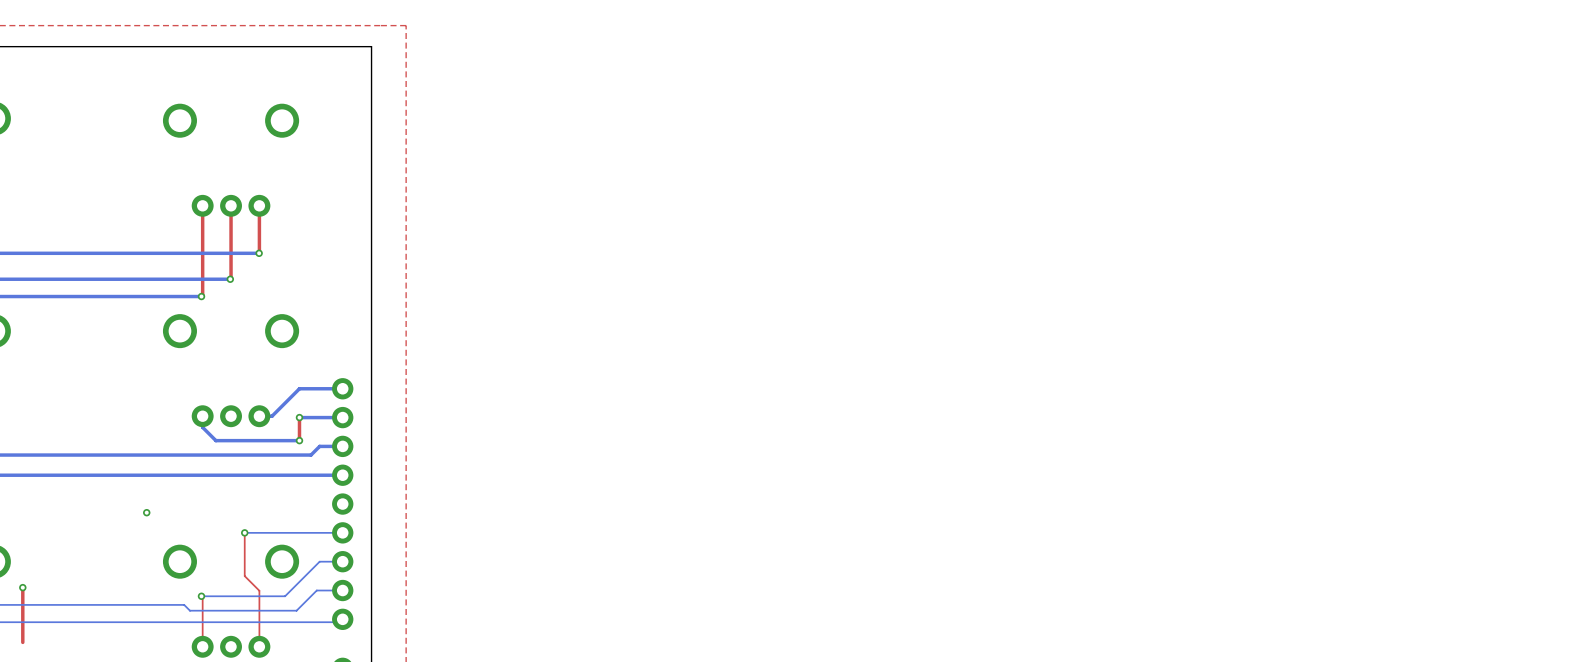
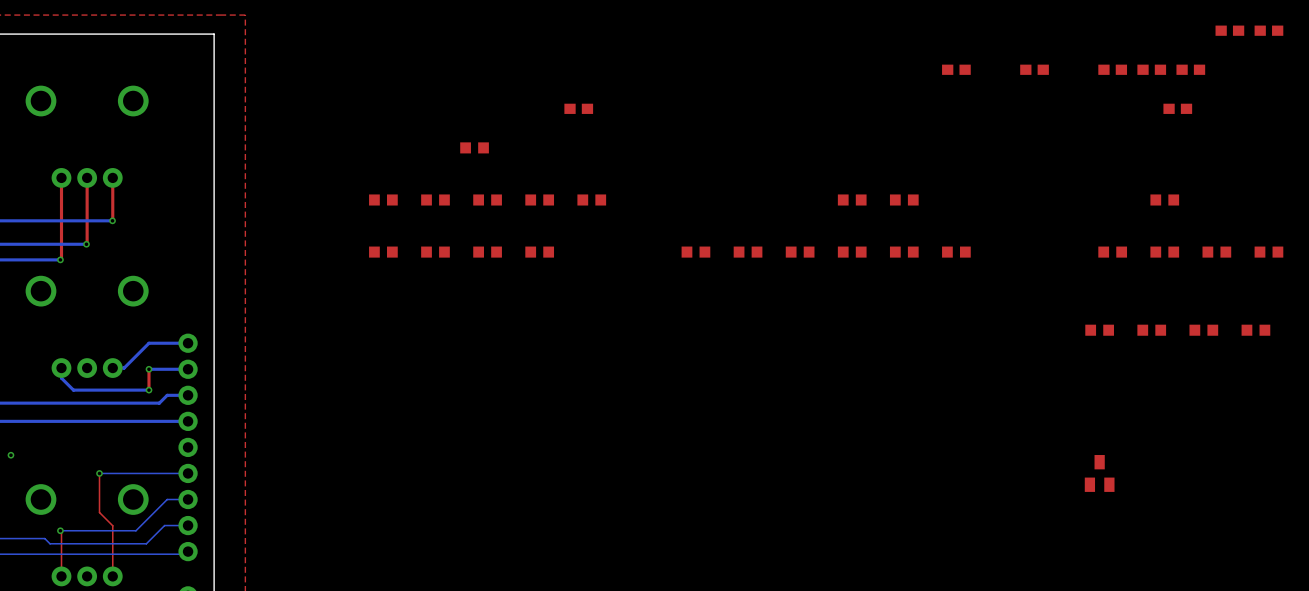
part: none -> (1229, 30)
part: none -> (1268, 30)
part: none -> (956, 69)
part: none -> (1034, 69)
part: none -> (1112, 69)
part: none -> (1151, 69)
part: none -> (1190, 69)
part: none -> (578, 108)
part: none -> (1177, 108)
part: none -> (474, 147)
part: none -> (383, 199)
part: none -> (435, 199)
part: none -> (487, 199)
part: none -> (539, 199)
part: none -> (591, 199)
part: none -> (852, 199)
part: none -> (904, 199)
part: none -> (1164, 199)
part: none -> (383, 252)
part: none -> (435, 252)
part: none -> (487, 252)
part: none -> (539, 252)
part: none -> (695, 252)
part: none -> (748, 252)
part: none -> (800, 252)
part: none -> (852, 252)
part: none -> (904, 252)
part: none -> (956, 252)
part: none -> (1112, 252)
part: none -> (1164, 252)
part: none -> (1216, 252)
part: none -> (1268, 252)
part: none -> (1099, 330)
part: none -> (1151, 330)
part: none -> (1203, 330)
part: none -> (1255, 330)
part: none -> (1099, 473)

